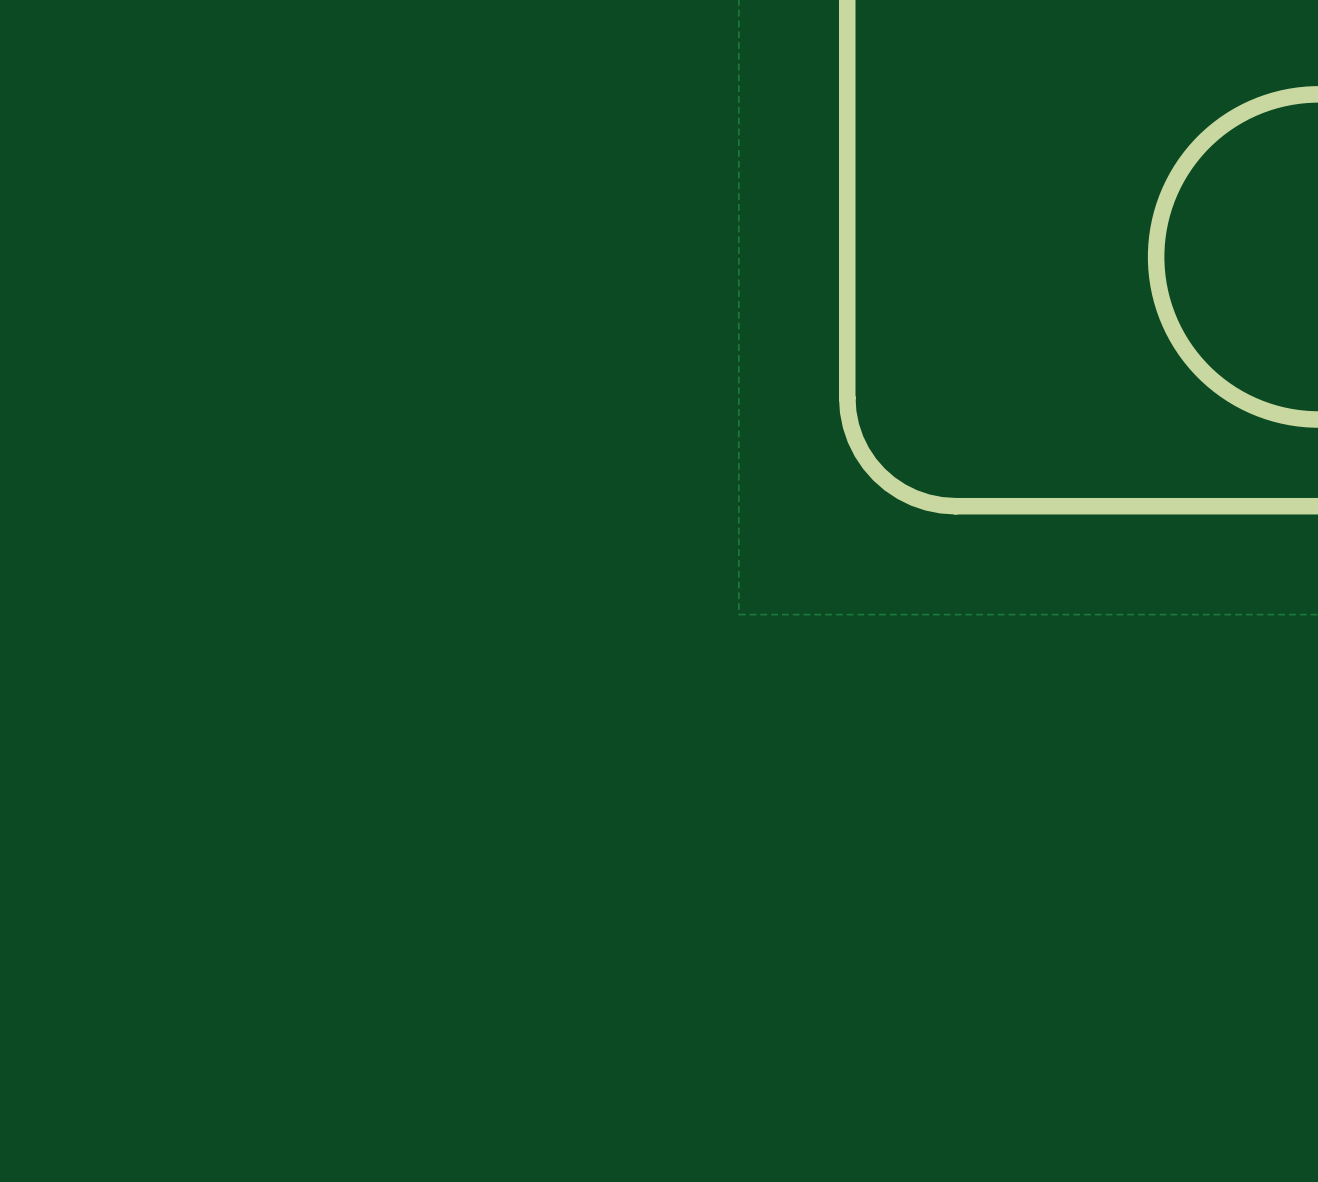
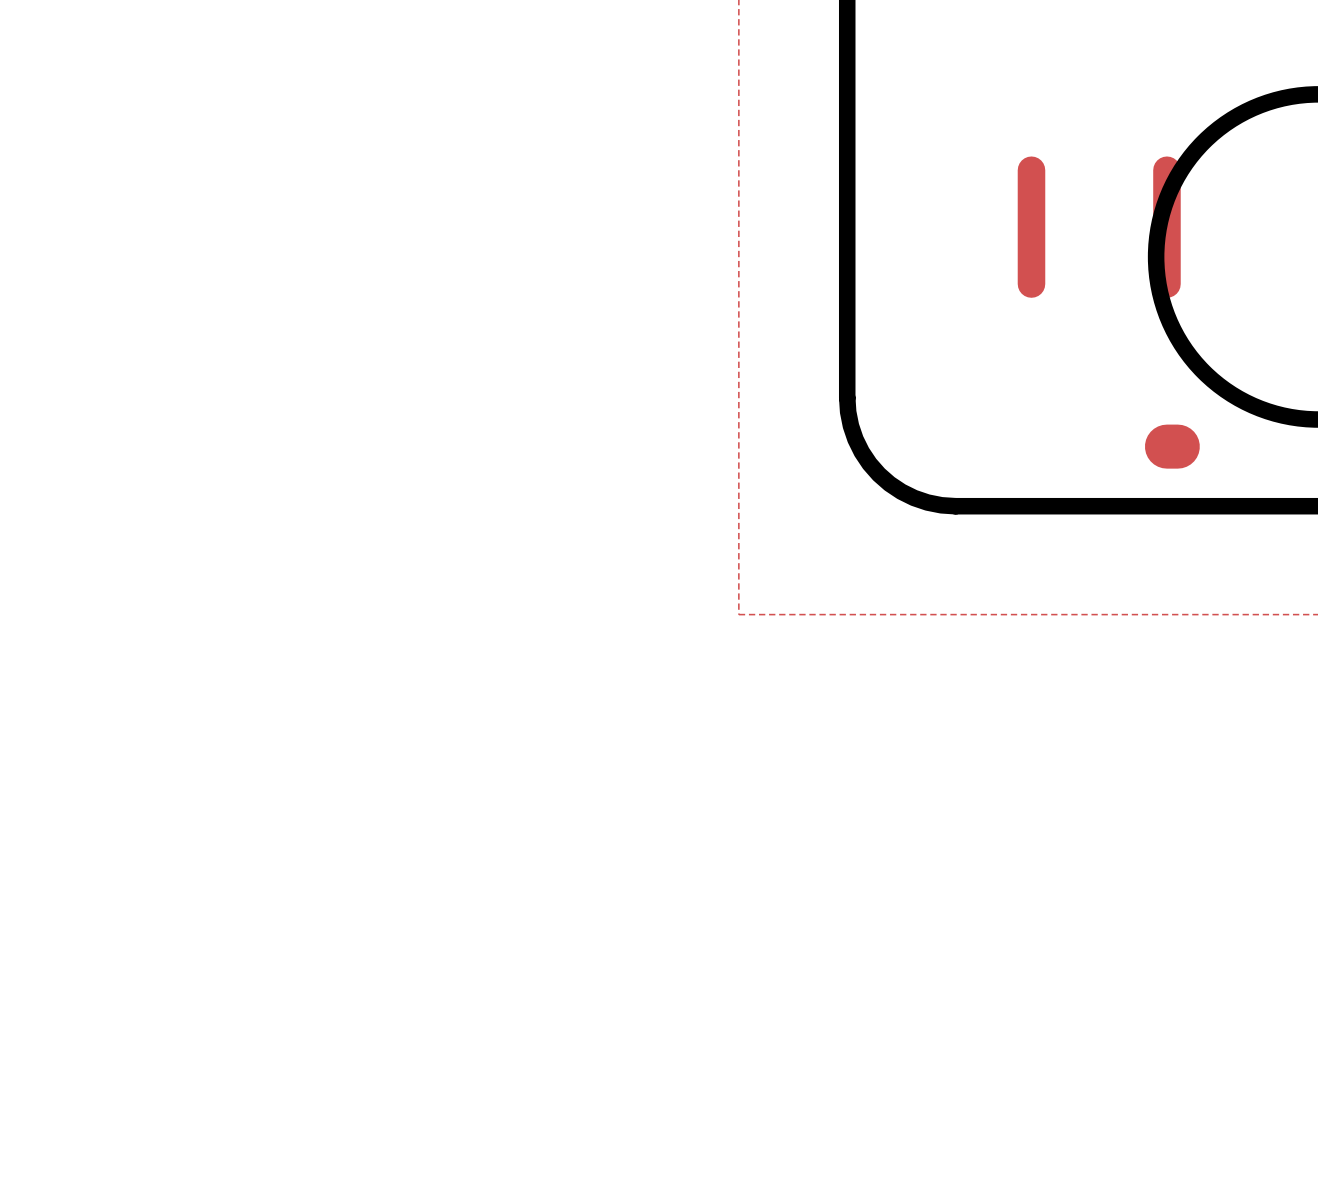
track: none -> (1031, 170) (1031, 284)
track: none -> (1166, 170) (1166, 284)
track: none -> (1166, 446) (1177, 446)

